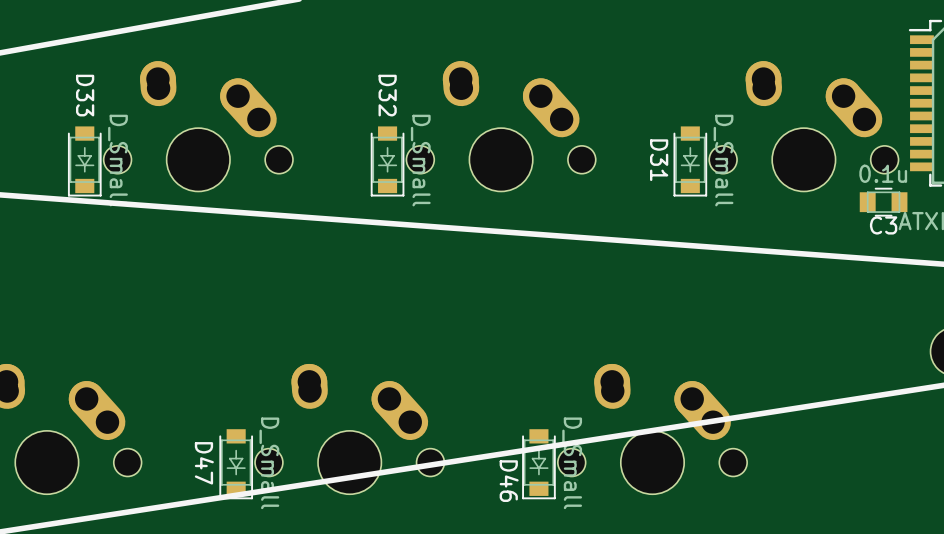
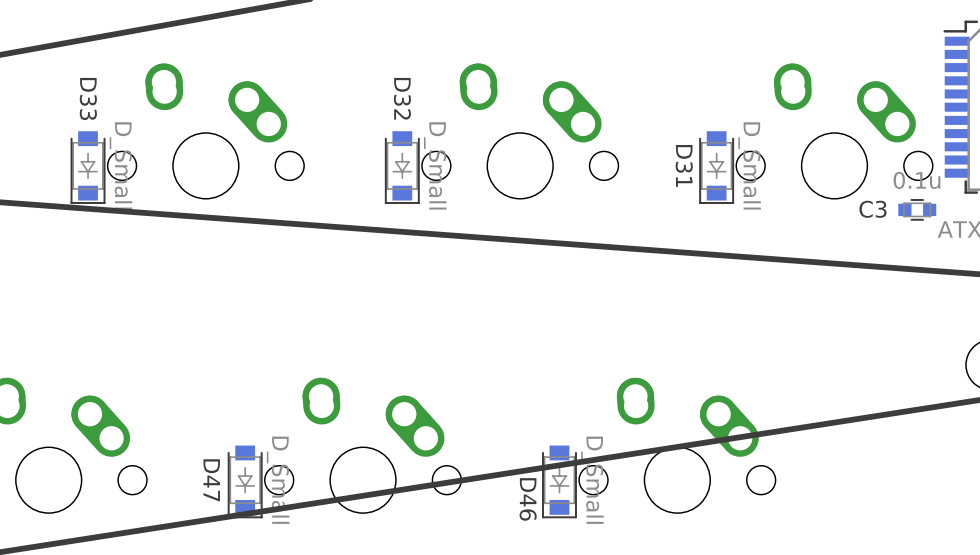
C3 footprint: [859, 187, 908, 217] -> [898, 198, 937, 221]
C3 name position: C3 (883, 225) -> C3 (872, 209)

